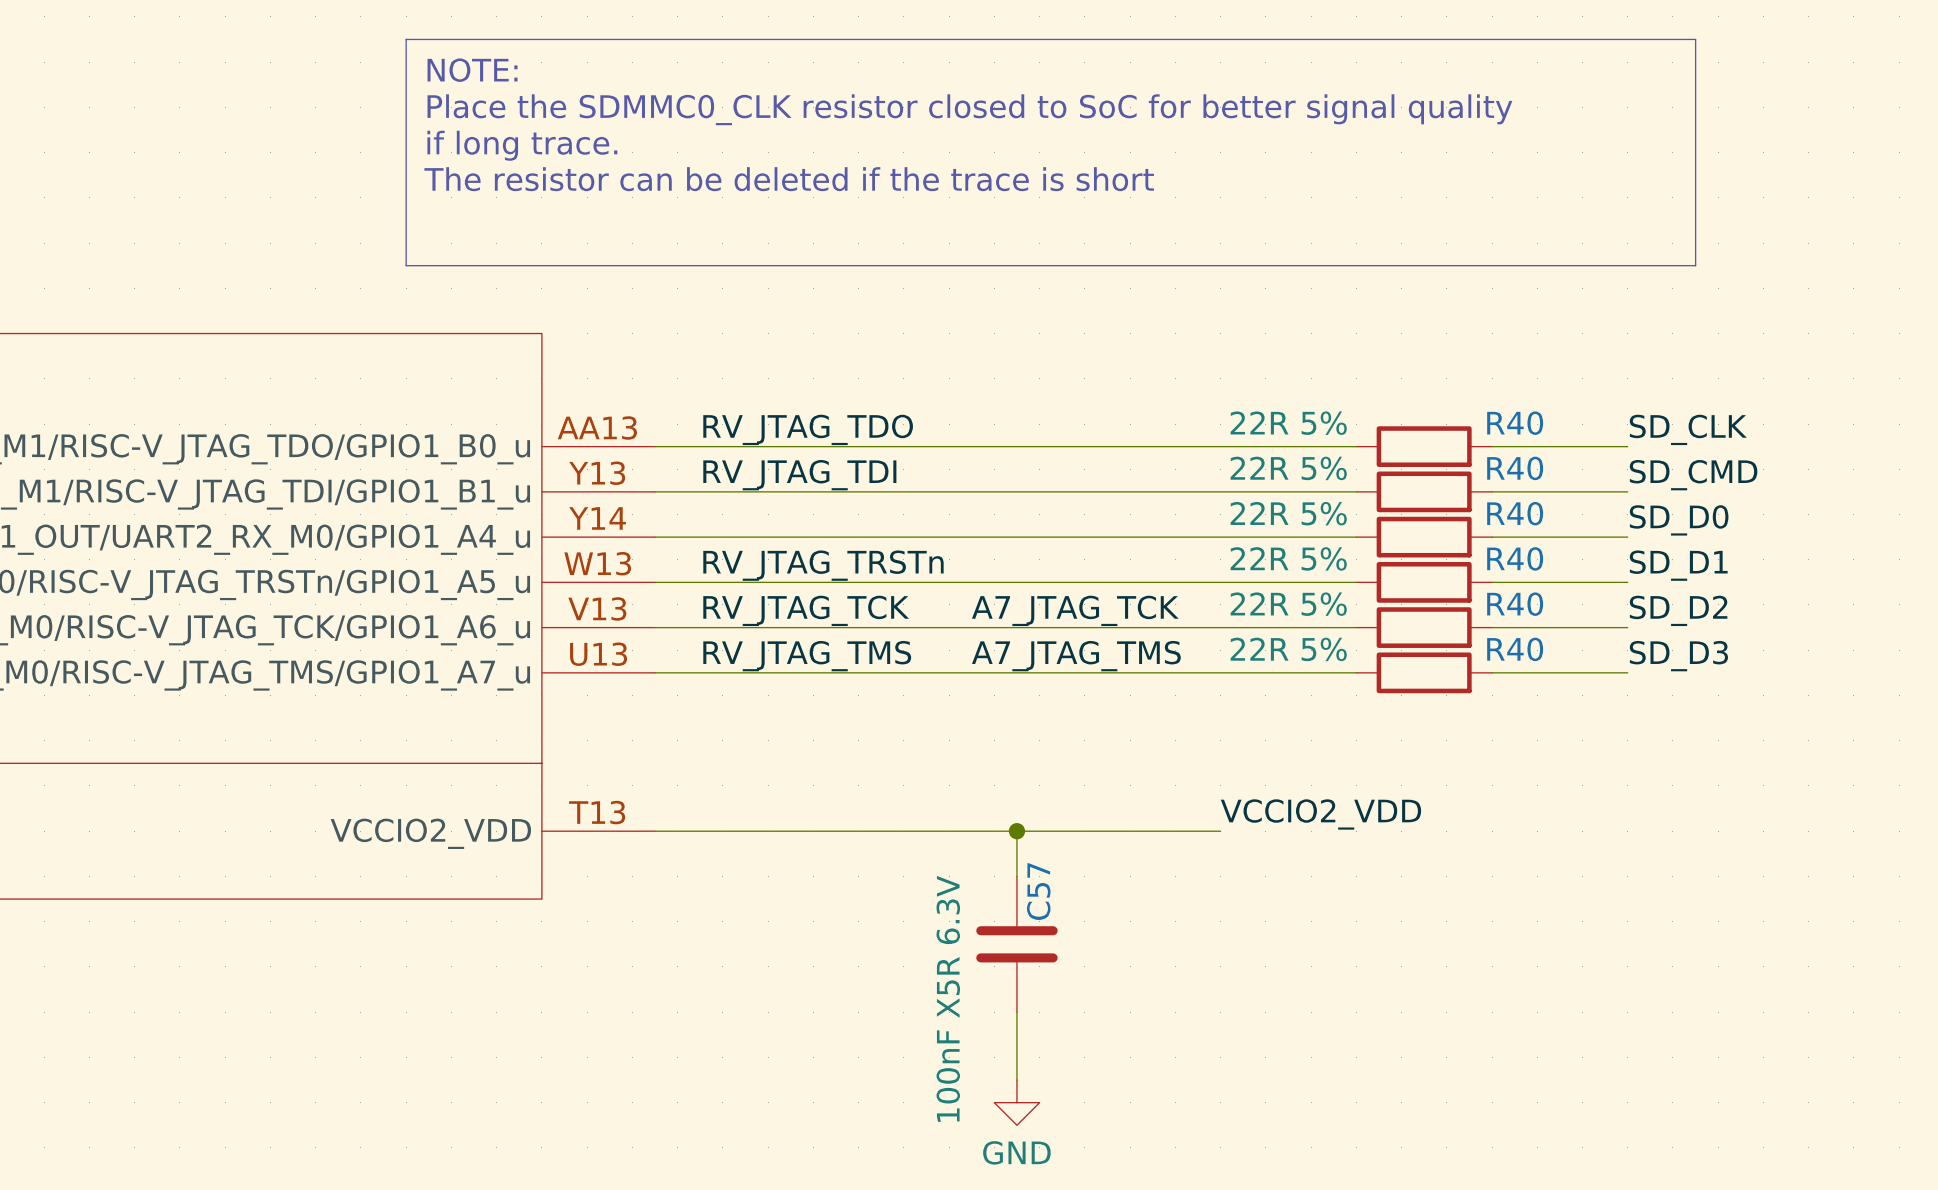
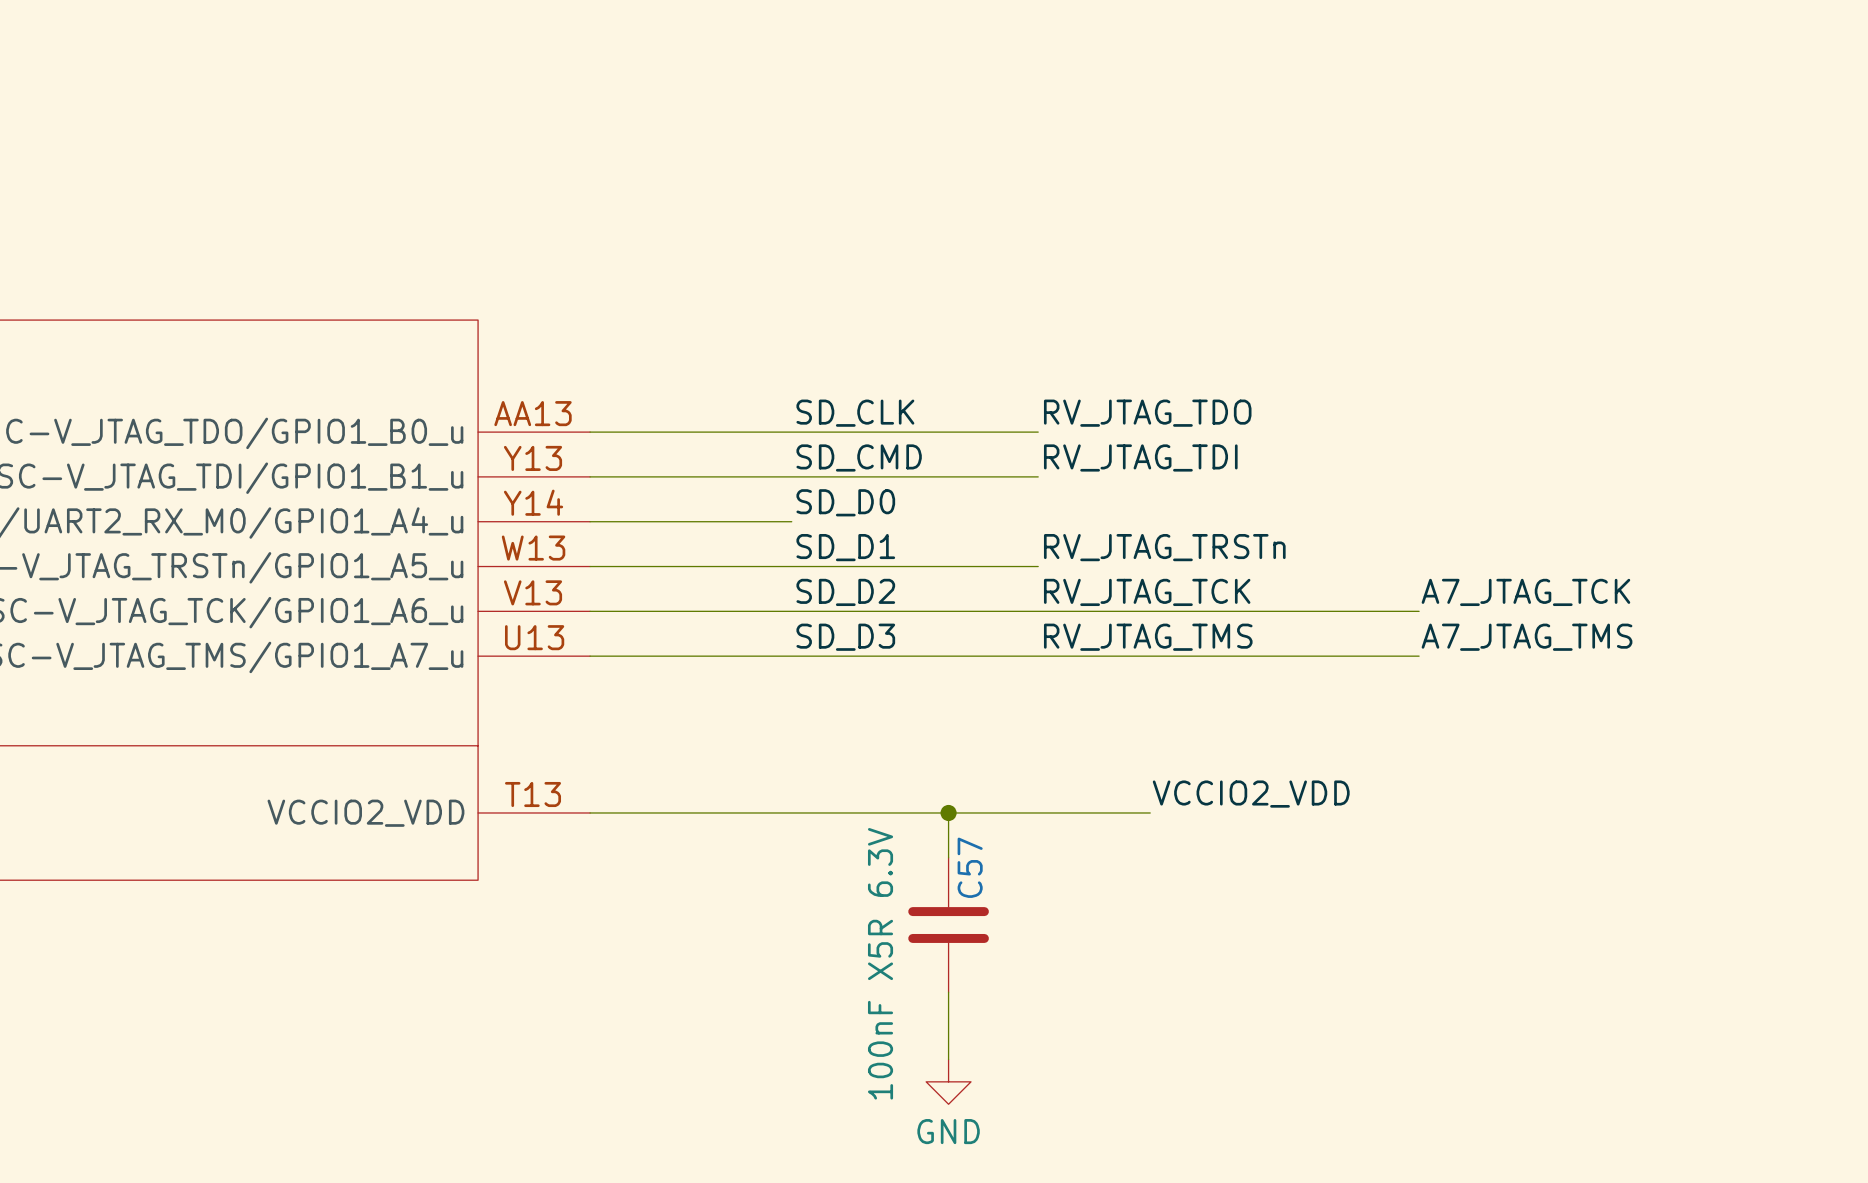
line: (406, 39) (1695, 39) (1695, 265) (406, 265) (406, 39) -> none
text: NOTE: (472, 70) -> none
text: Place the SDMMC0_CLK resistor closed to SoC for better signal quality (969, 109) -> none
text: if long trace. (522, 145) -> none
text: The resistor can be deleted if the trace is short (789, 179) -> none
label position: RV_JTAG_TDO (808, 429) -> RV_JTAG_TDO (1147, 413)
label: none -> SD_CLK (855, 413)
label: SD_CLK (1688, 429) -> none
wire: (1107, 446) (1356, 446) -> none
R40: 22R 5% (1424, 446) -> none
wire: (1492, 446) (1627, 446) -> none
label position: RV_JTAG_TDI (799, 475) -> RV_JTAG_TDI (1140, 457)
label: none -> SD_CMD (859, 457)
label: SD_CMD (1693, 475) -> none
wire: (1107, 491) (1356, 491) -> none
R40: 22R 5% (1424, 491) -> none
wire: (1492, 491) (1627, 491) -> none
label: none -> SD_D0 (845, 502)
label: SD_D0 (1679, 520) -> none
wire: (858, 537) (1356, 537) -> none
R40: 22R 5% (1424, 537) -> none
wire: (1492, 537) (1627, 537) -> none
label position: RV_JTAG_TRSTn (823, 565) -> RV_JTAG_TRSTn (1164, 547)
label: none -> SD_D1 (845, 547)
label: SD_D1 (1678, 565) -> none
wire: (1107, 582) (1356, 582) -> none
R40: 22R 5% (1424, 582) -> none
wire: (1492, 582) (1627, 582) -> none
label position: RV_JTAG_TCK (806, 610) -> RV_JTAG_TCK (1147, 592)
label: none -> SD_D2 (845, 592)
label: A7_JTAG_TCK (1075, 610) -> none
label: none -> A7_JTAG_TCK (1525, 592)
label: SD_D2 (1678, 610) -> none
R40: 22R 5% (1424, 627) -> none
wire: (1492, 627) (1627, 627) -> (1419, 611) (1284, 611)
label position: RV_JTAG_TMS (807, 656) -> RV_JTAG_TMS (1148, 637)
label: none -> SD_D3 (845, 637)
label: A7_JTAG_TMS (1076, 656) -> none
label: none -> A7_JTAG_TMS (1527, 637)
label: SD_D3 (1678, 656) -> none
R40: 22R 5% (1424, 672) -> none
wire: (1492, 672) (1627, 672) -> (1419, 656) (1284, 656)

